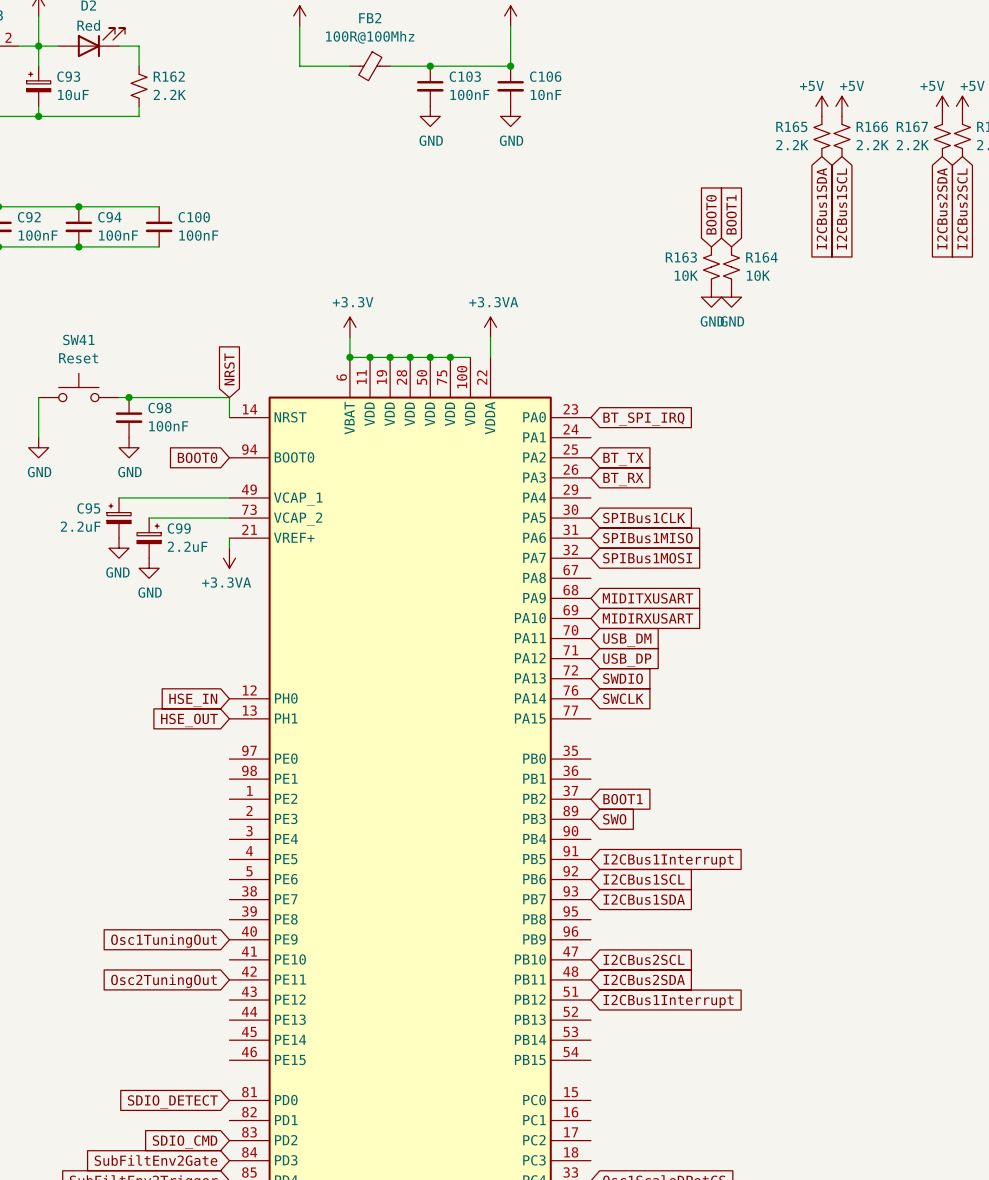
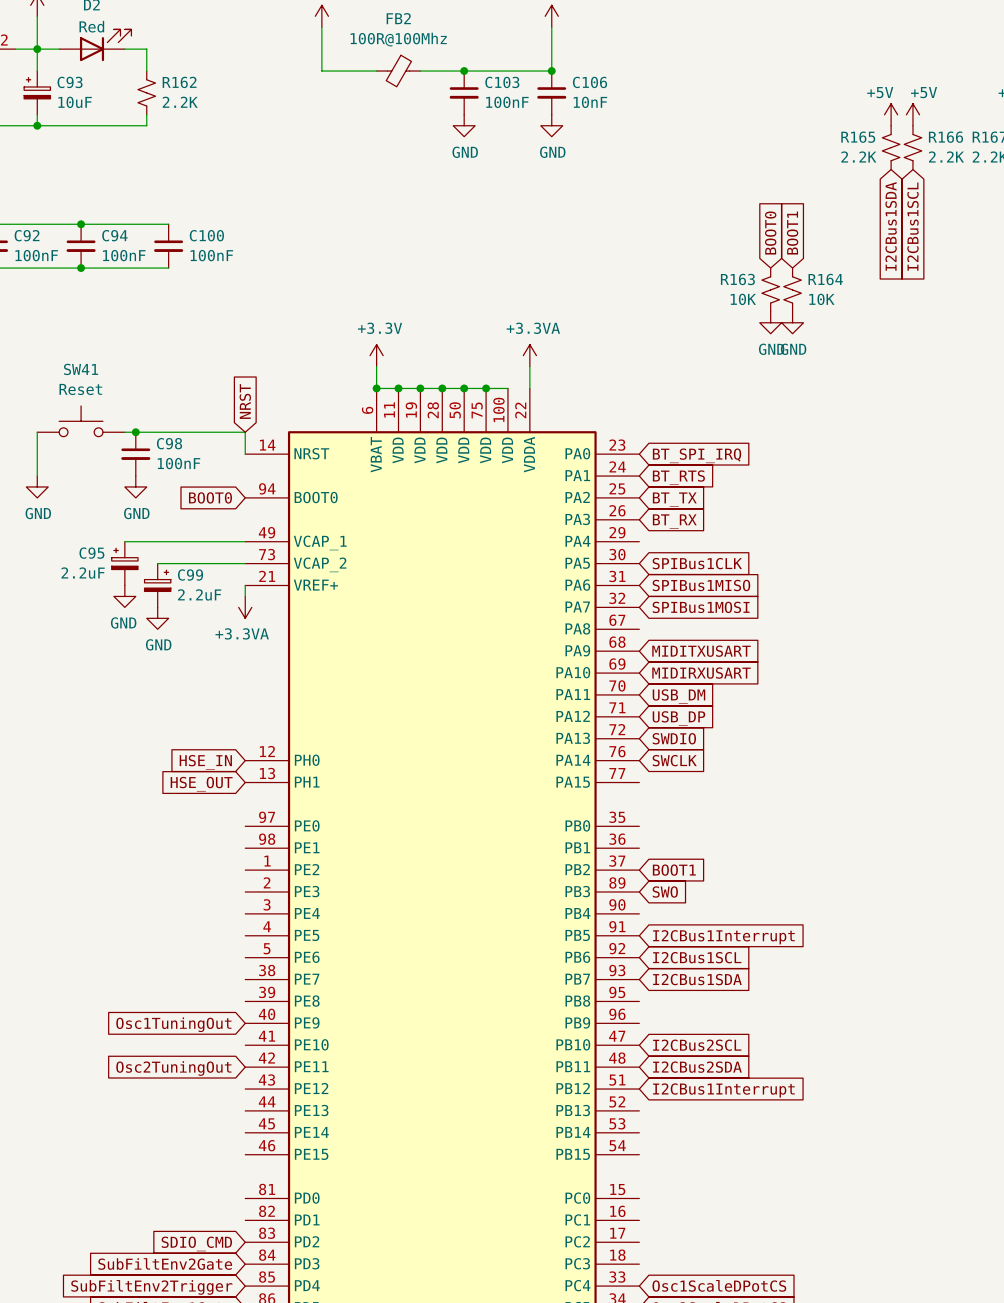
global label: none -> BT_RTS (678, 477)
global label: SDIO_DETECT (172, 1101) -> none

